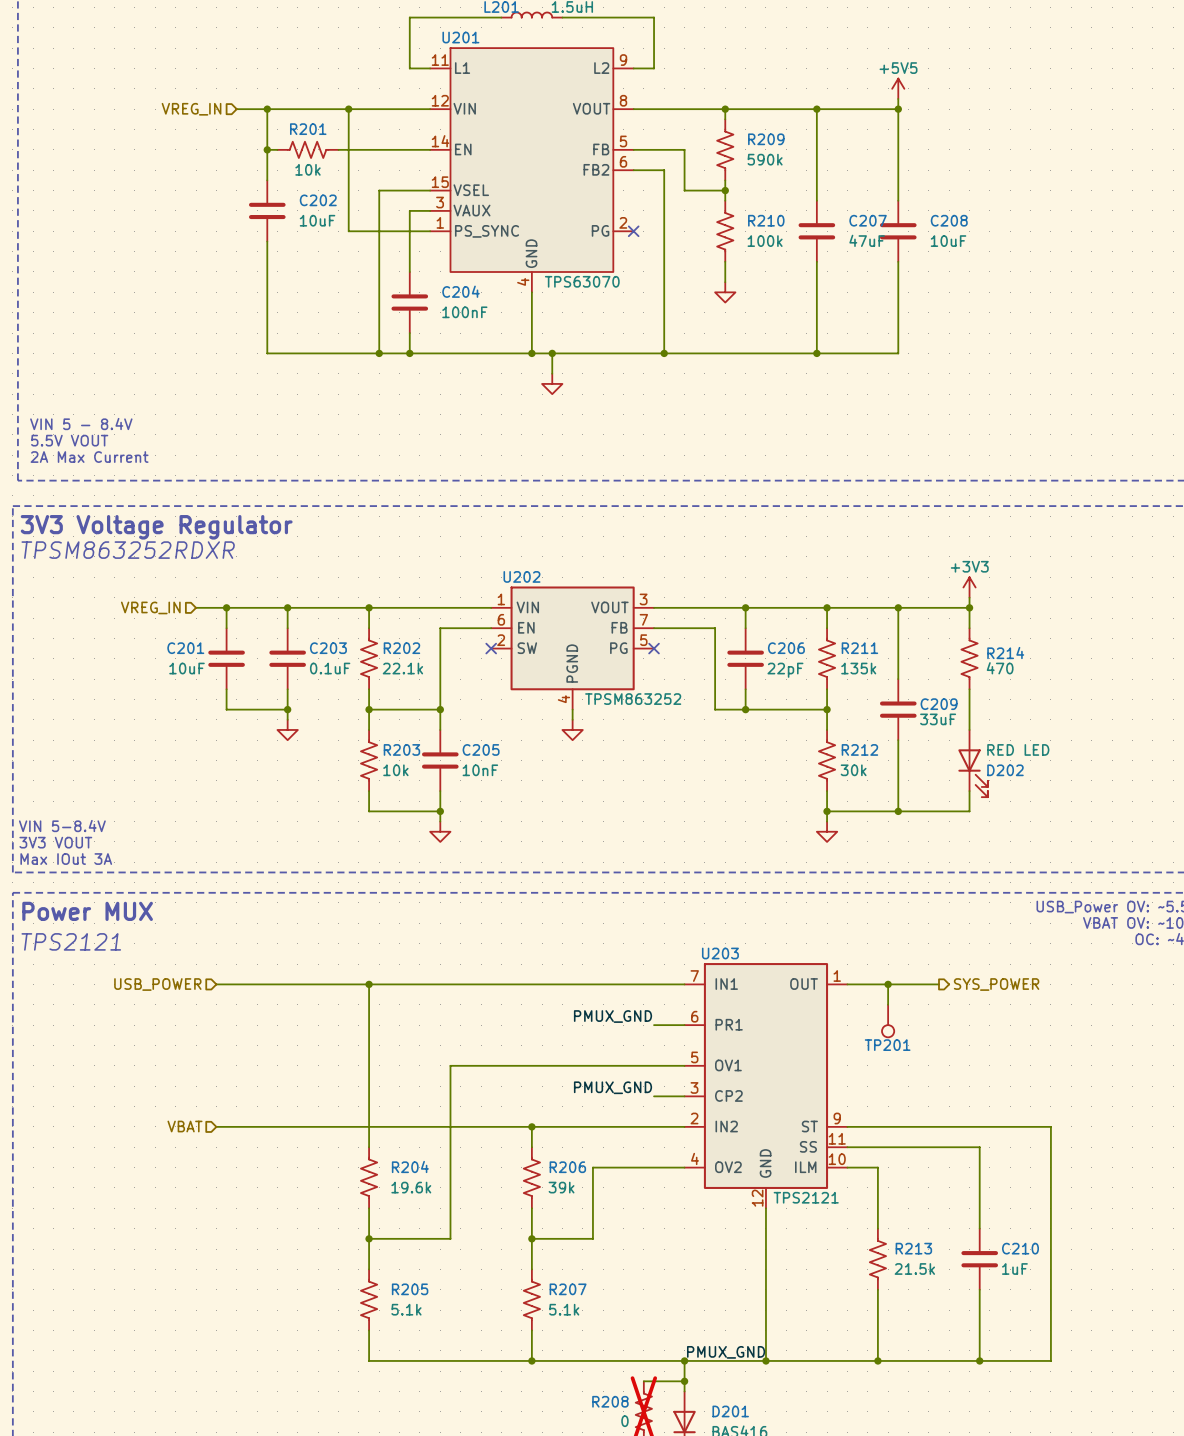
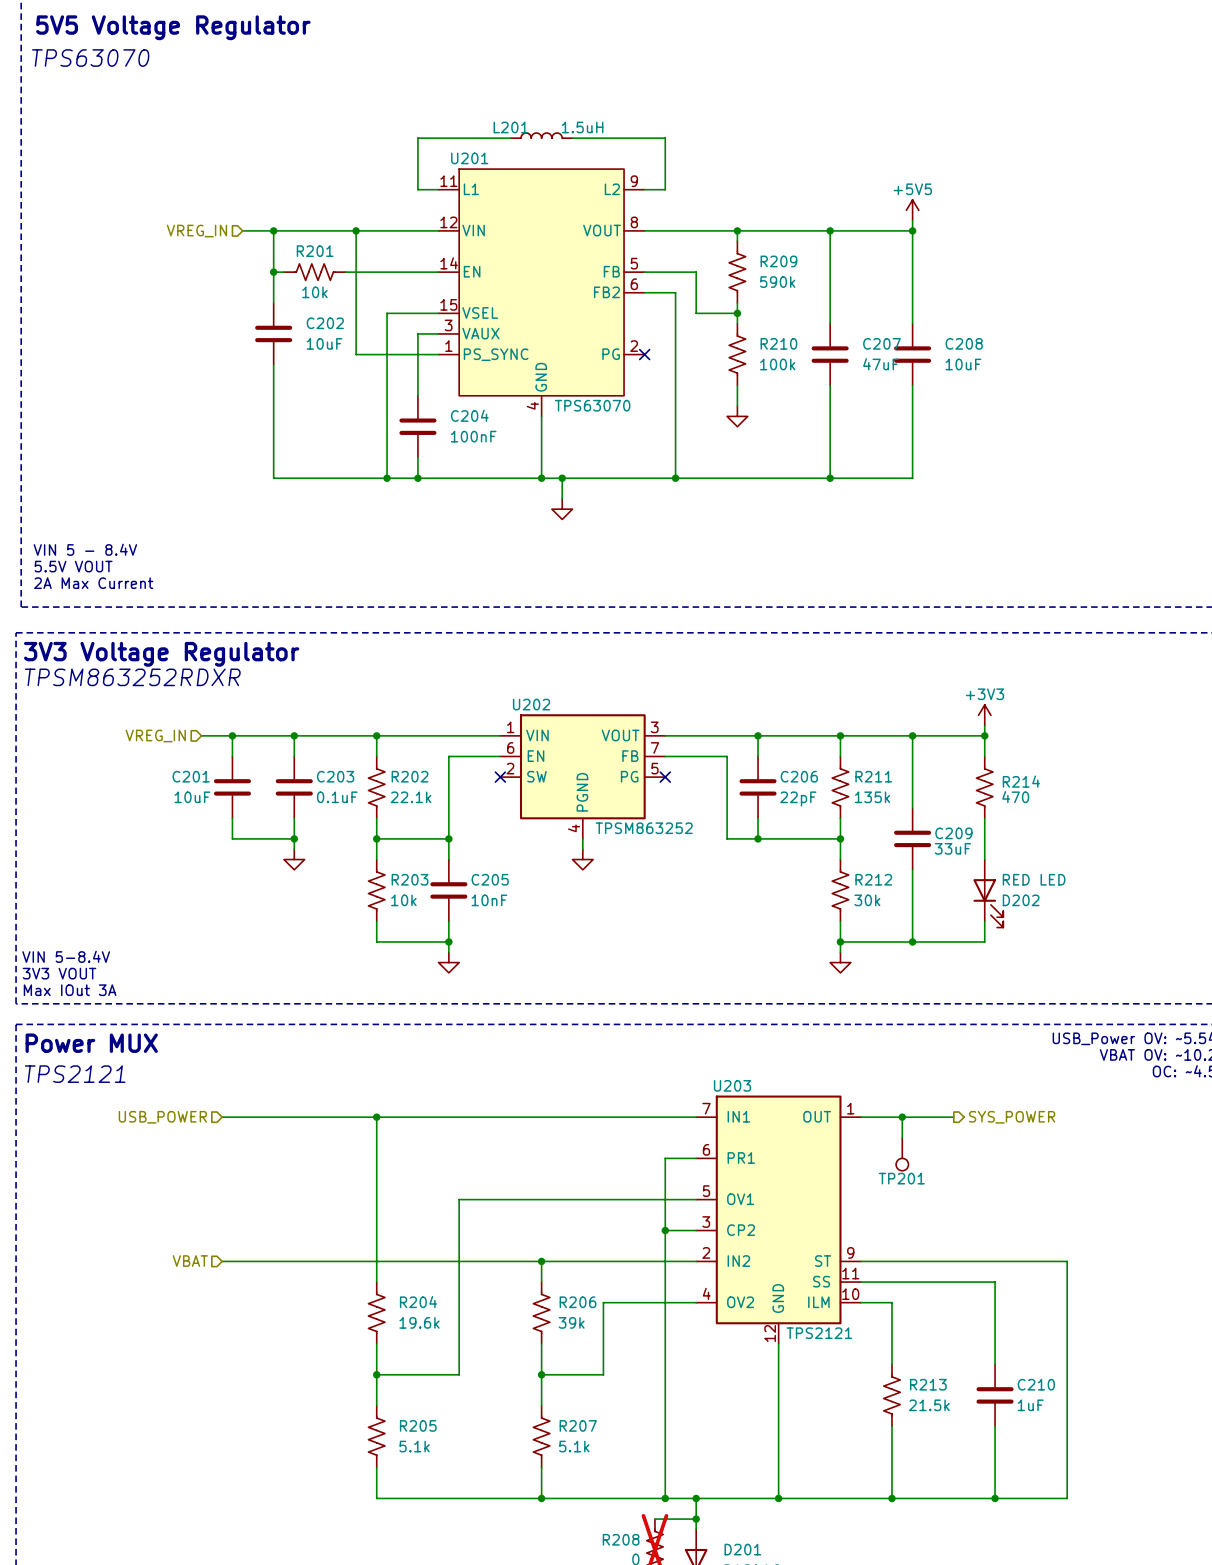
label: PMUX_GND (613, 1016) -> none
wire: none -> (665, 1158) (665, 1498)
label: PMUX_GND (613, 1087) -> none
junction: none -> (665, 1230)
label: PMUX_GND (726, 1352) -> none
junction: none -> (665, 1498)

